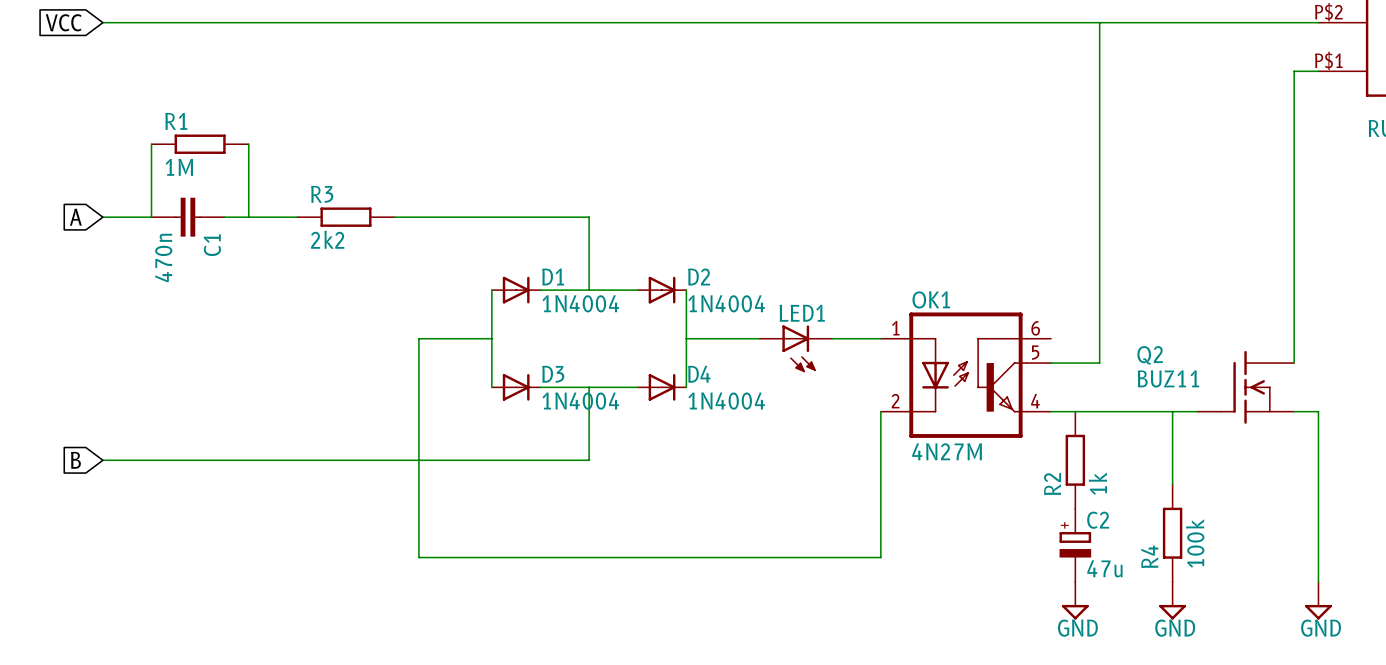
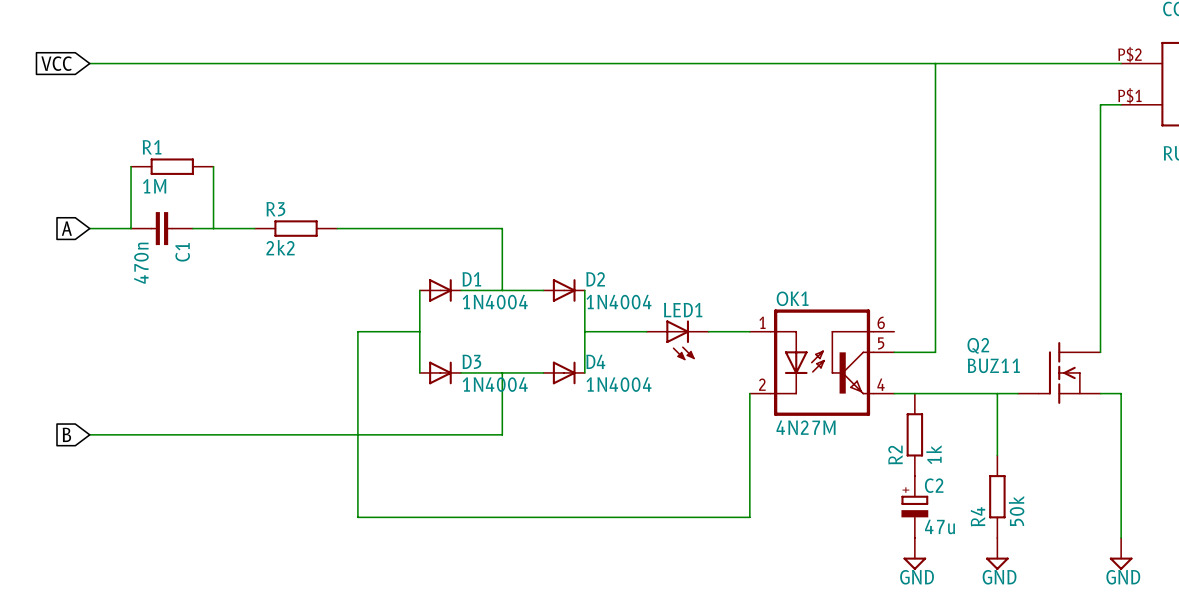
R4 value: 100k (1195, 543) -> 50k (1016, 511)

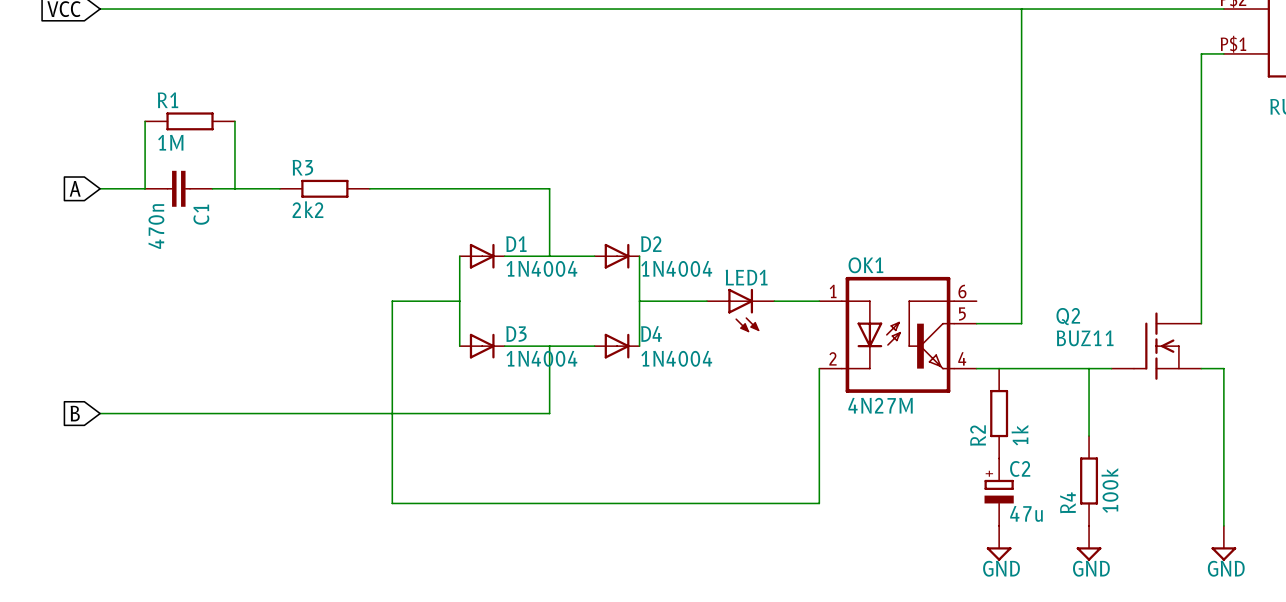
R4 value: 50k (1016, 511) -> 100k (1109, 490)

